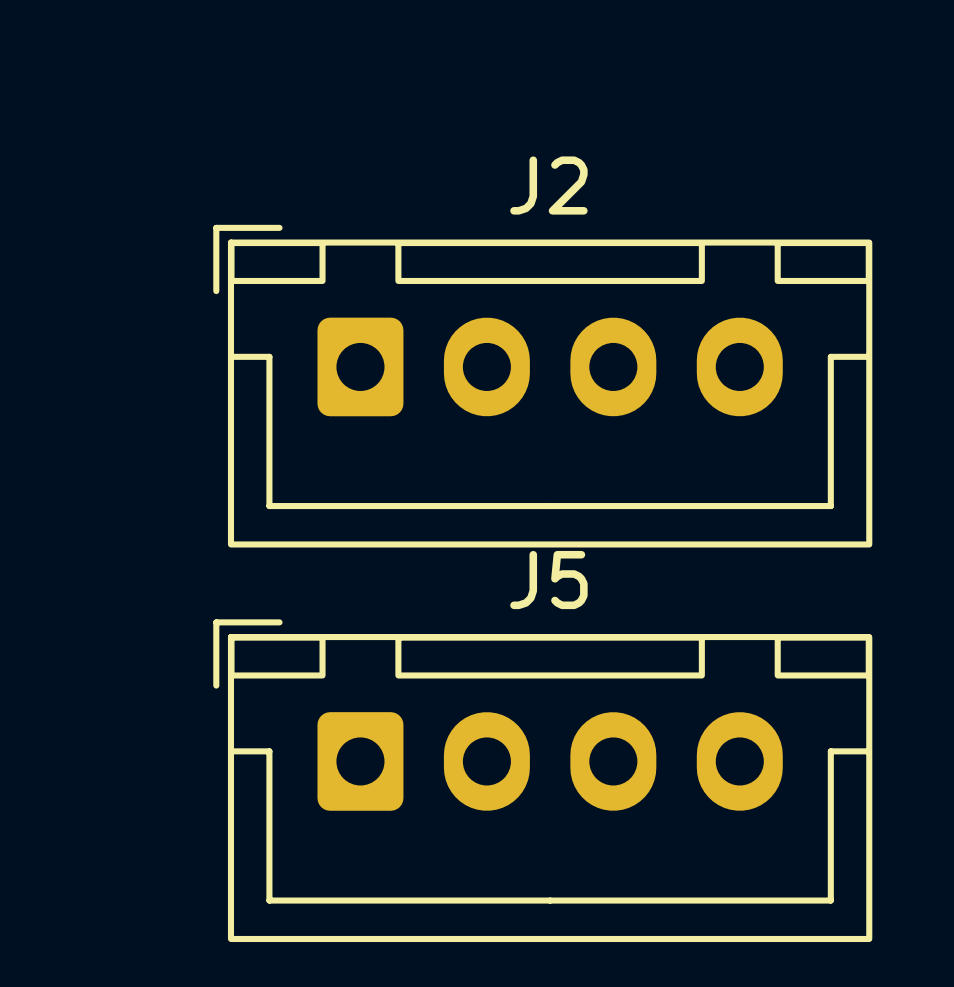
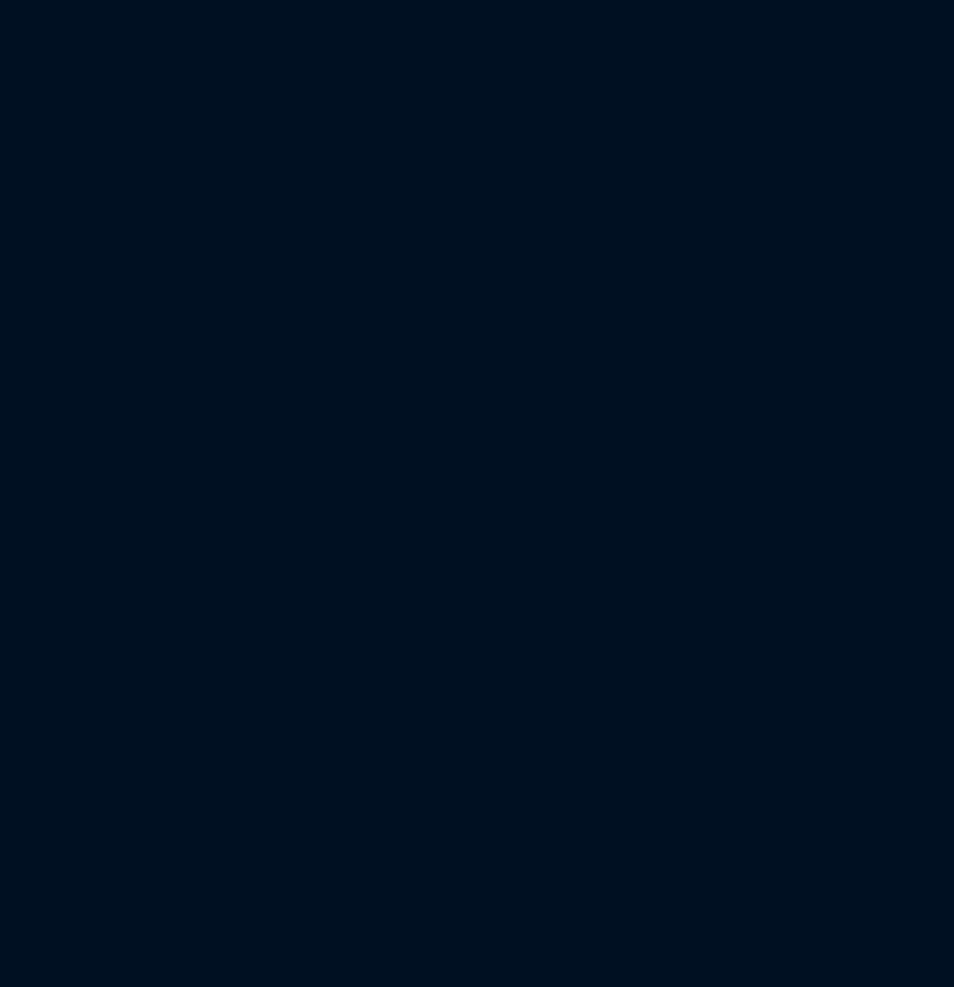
J2: (542, 386) -> none
J5: (542, 780) -> none

